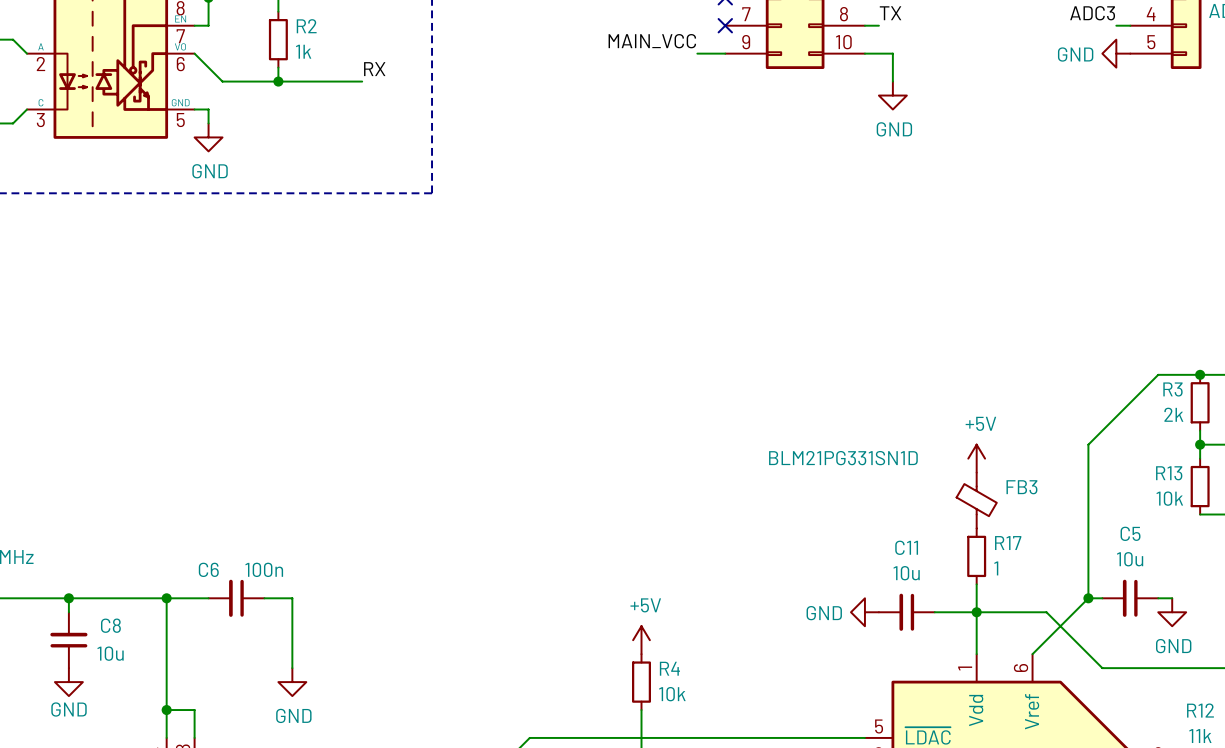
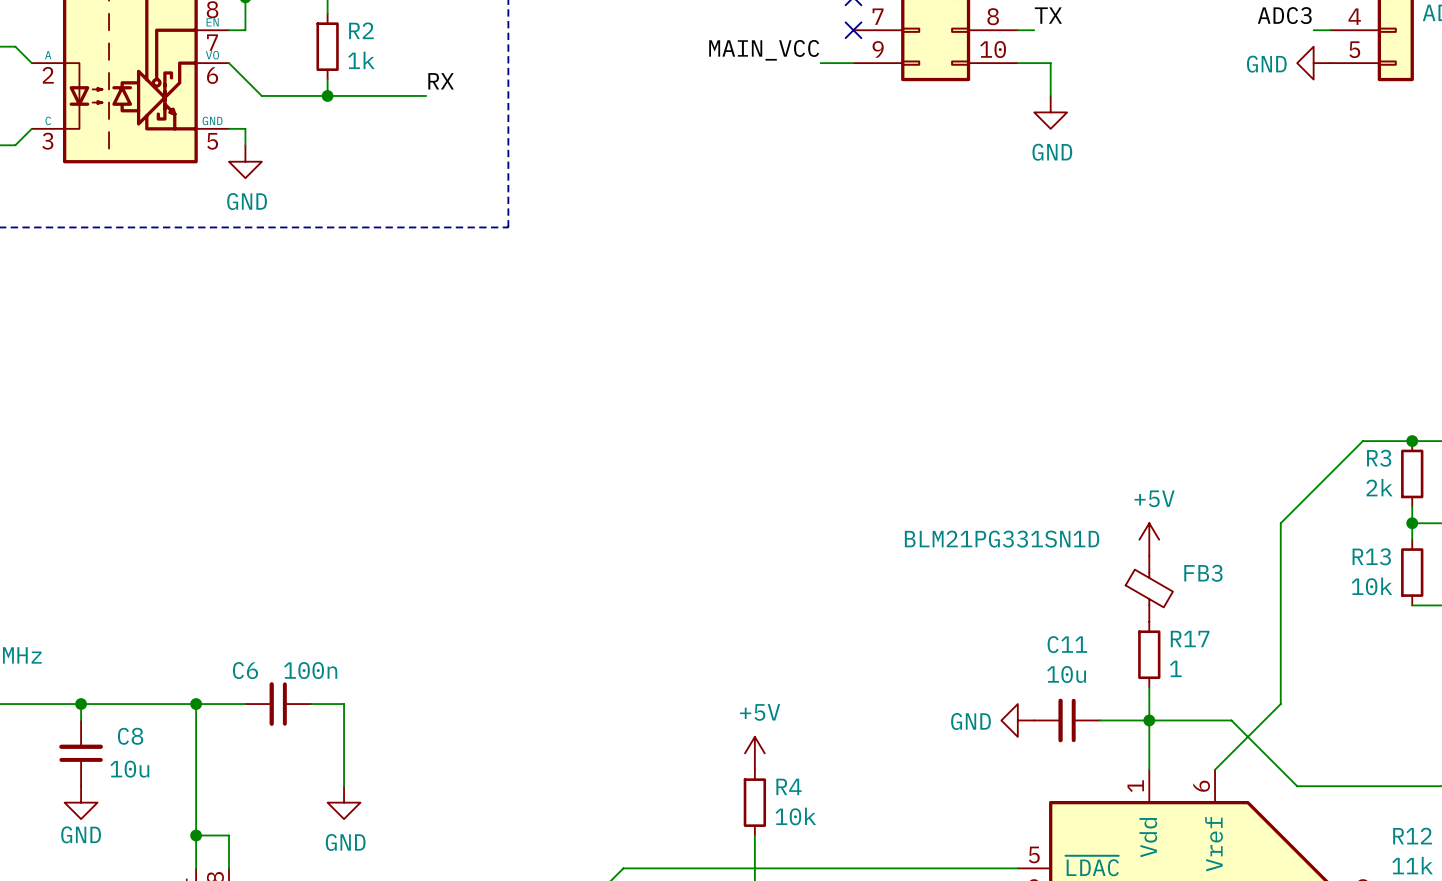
wire: (1088, 598) (1102, 598) -> none
junction: (1088, 598) -> none
C5: 10u (1130, 598) -> none
wire: (1158, 598) (1172, 598) -> none
power symbol: GND (1172, 612) -> none

